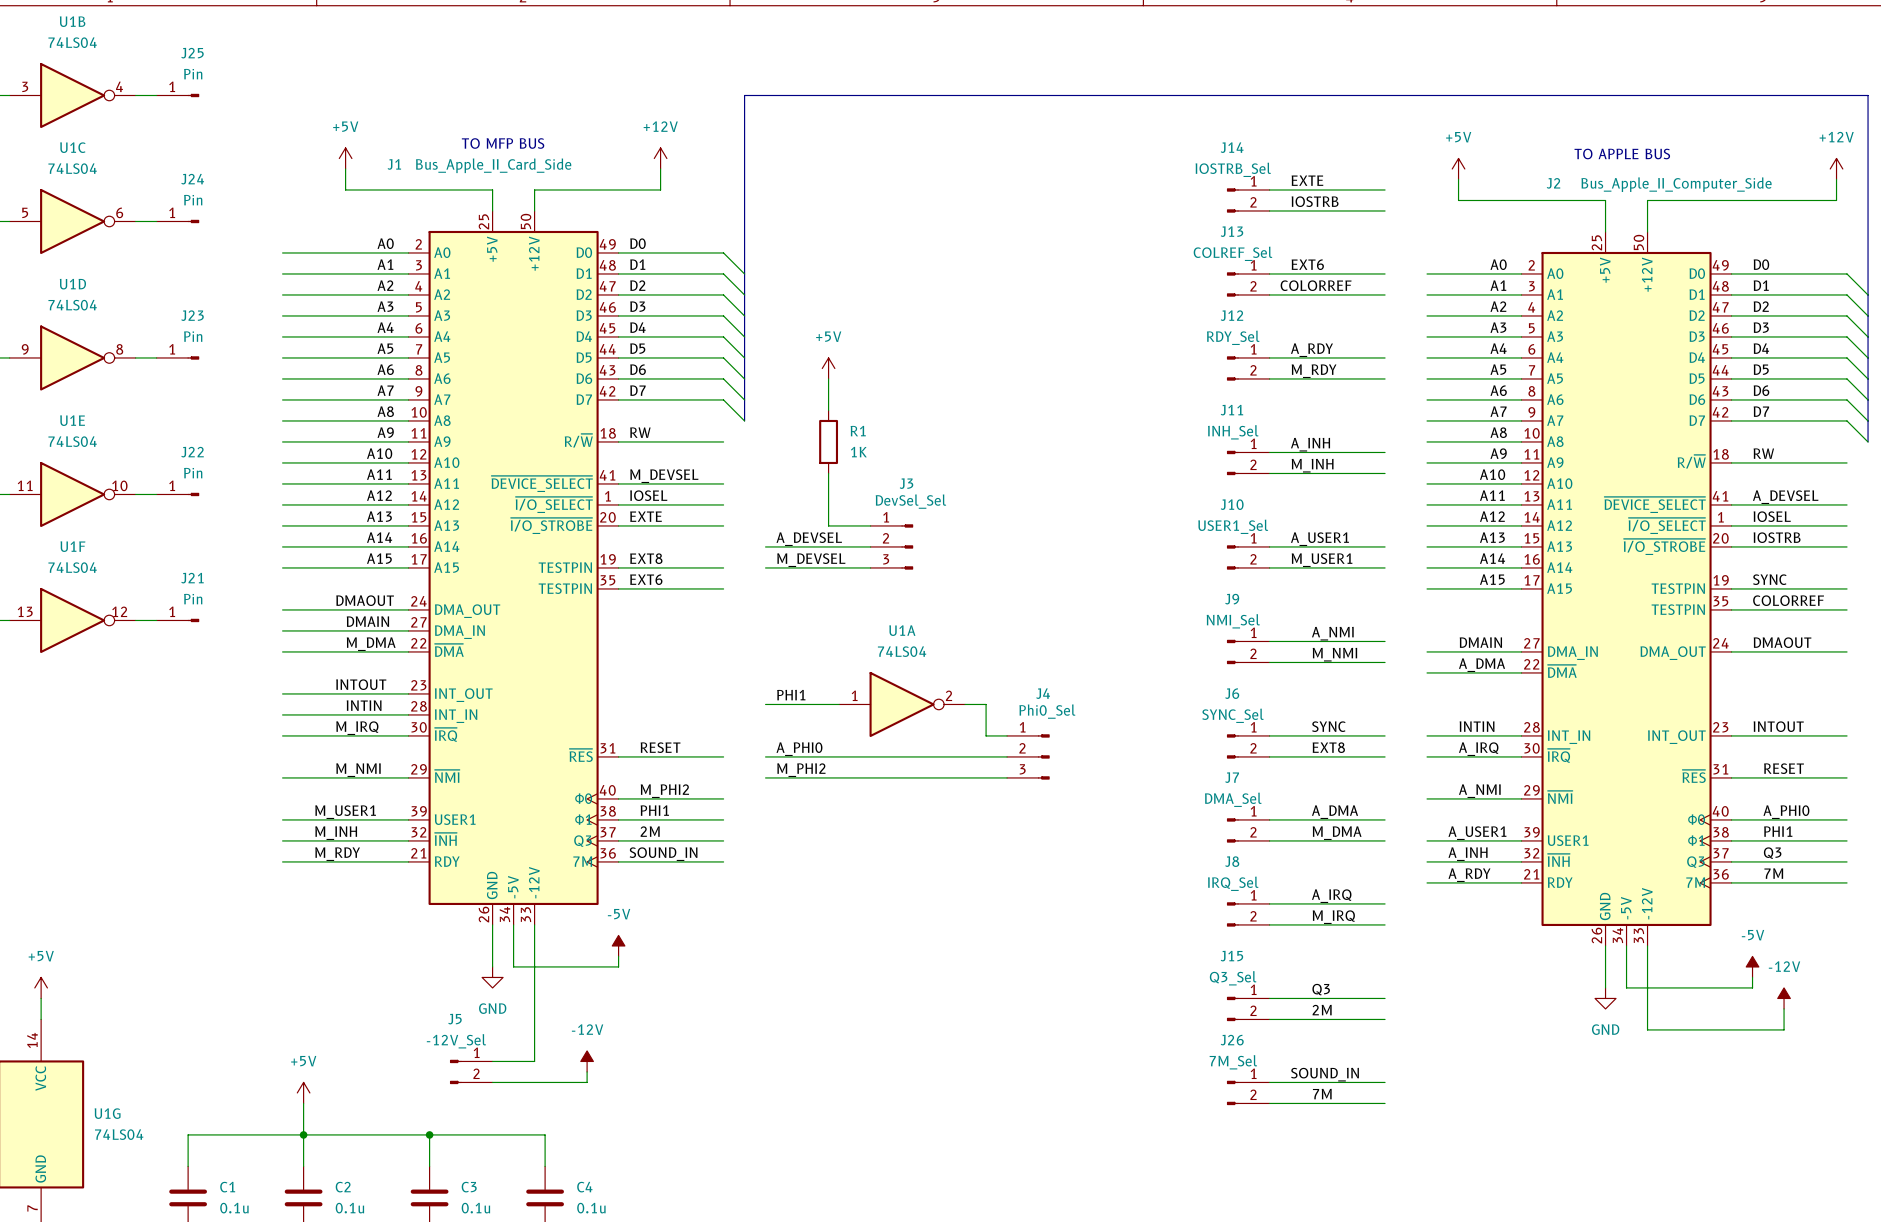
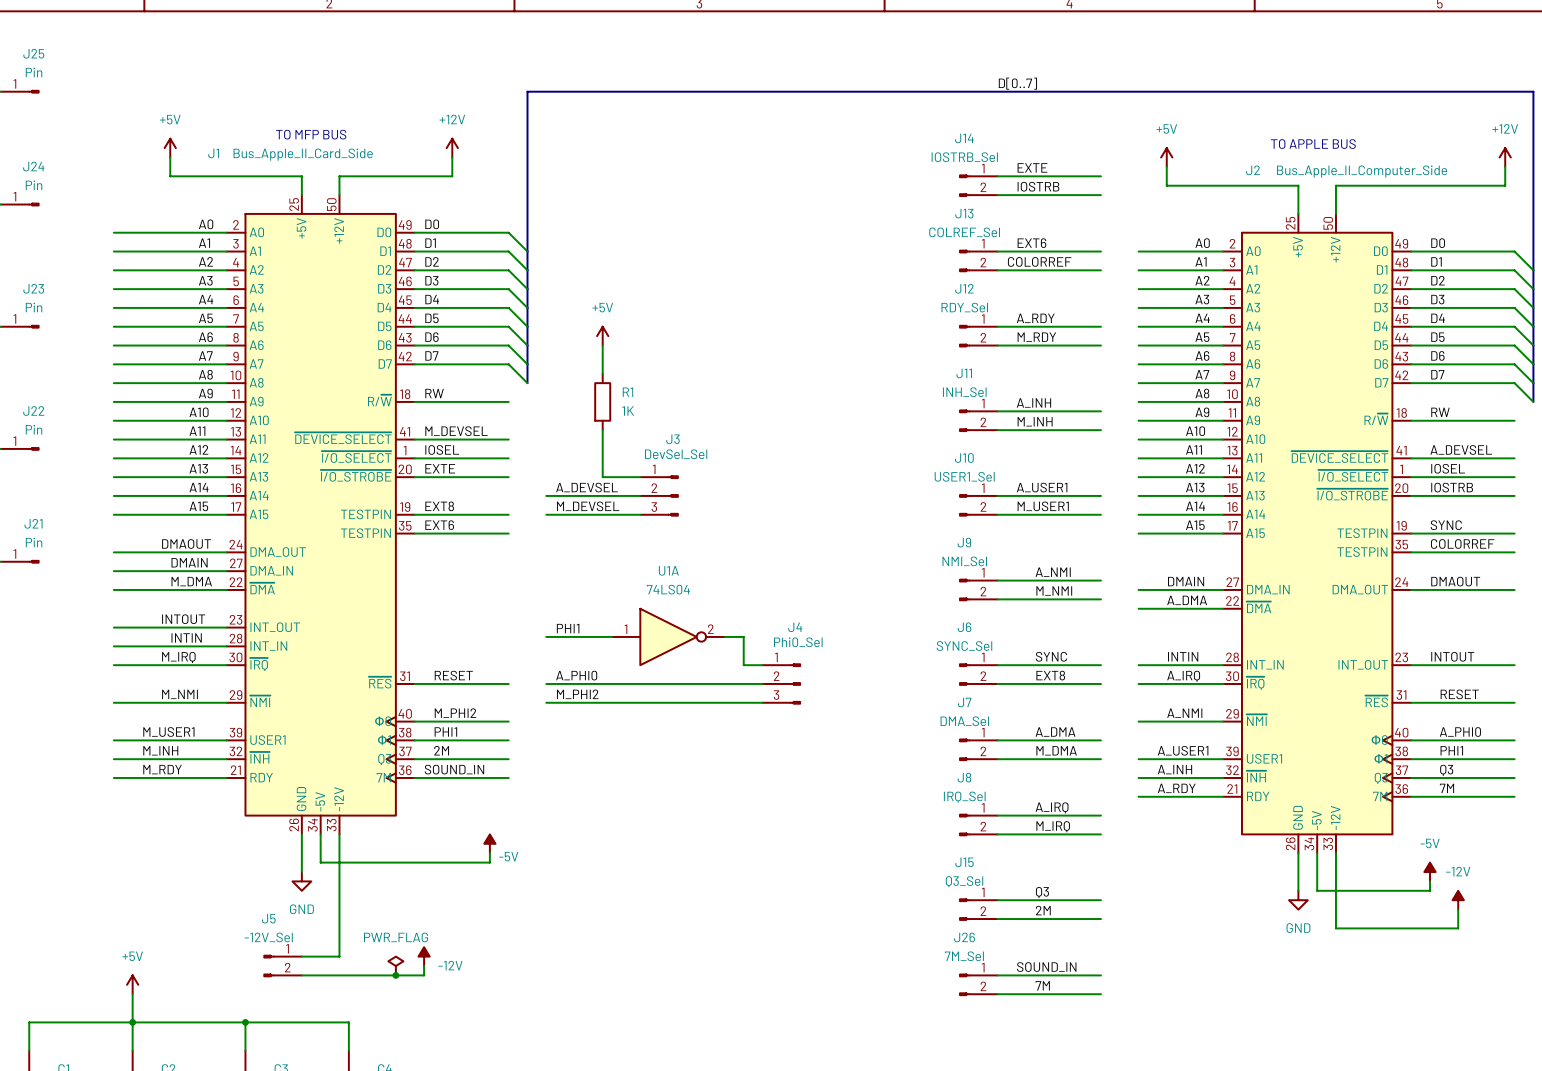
label: none -> D[0..7] (1017, 83)
power symbol text position: -5V (619, 914) -> -5V (508, 856)
power symbol position: -5V (618, 945) -> -5V (489, 843)
wire: (513, 956) (513, 966) (618, 966) (618, 956) -> (320, 862) (489, 862) (489, 853)
power symbol text position: -12V (587, 1029) -> -12V (450, 965)
power symbol position: -12V (587, 1061) -> -12V (424, 956)
wire: (587, 1071) (587, 1082) -> (424, 966) (424, 975) (386, 975)
power symbol: none -> PWR_FLAG (395, 966)
junction: none -> (395, 975)

